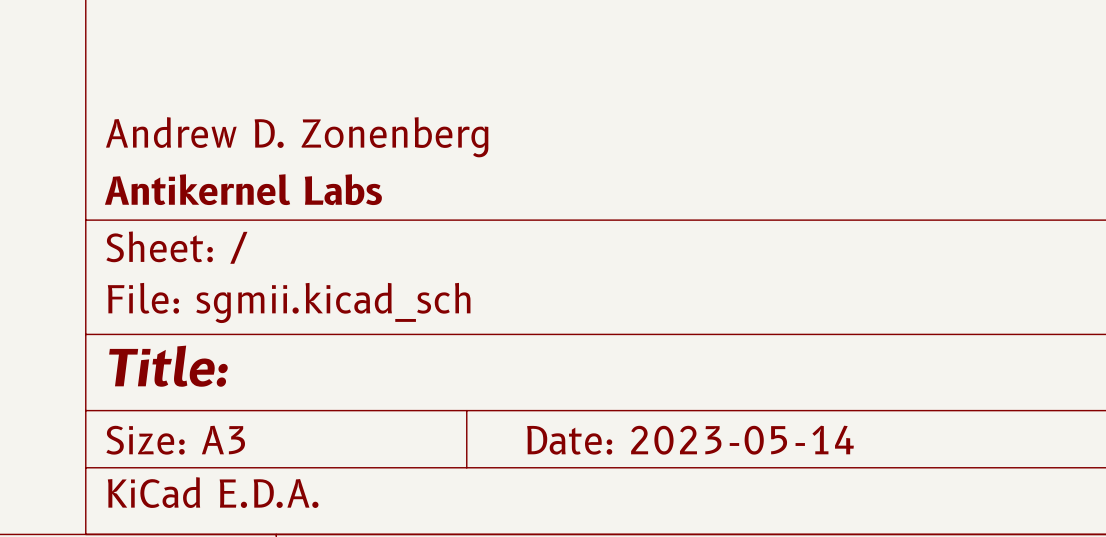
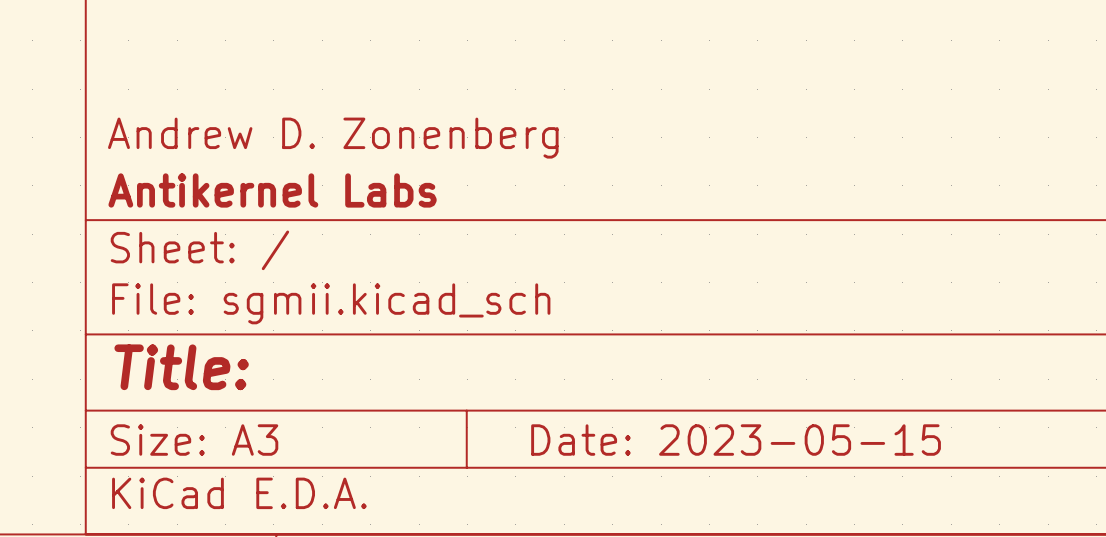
title block: Date: 2023-05-14 (690, 440) -> Date: 2023-05-15 (736, 440)

